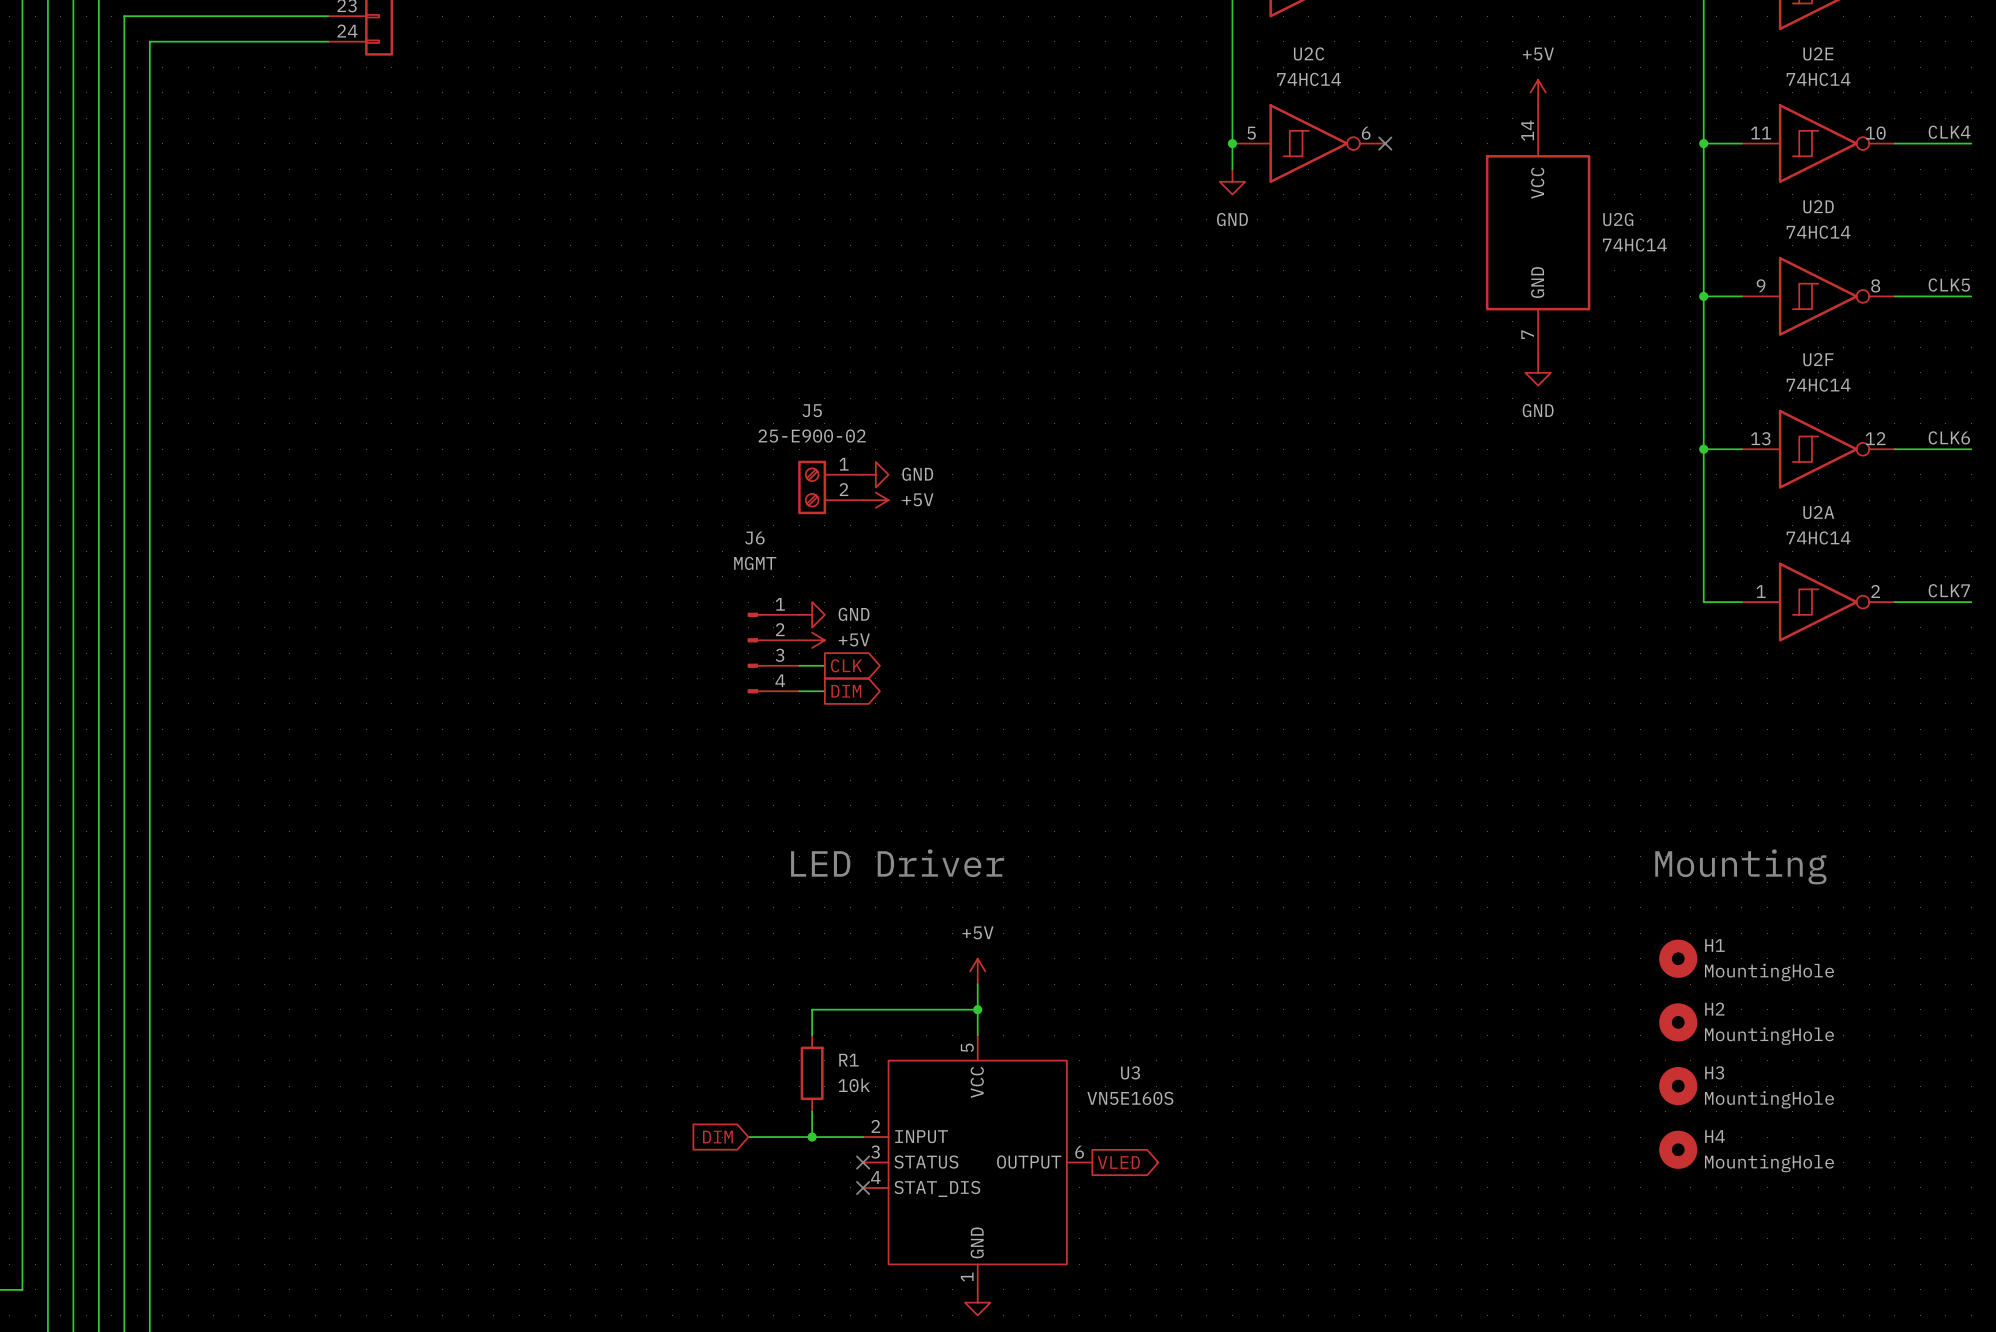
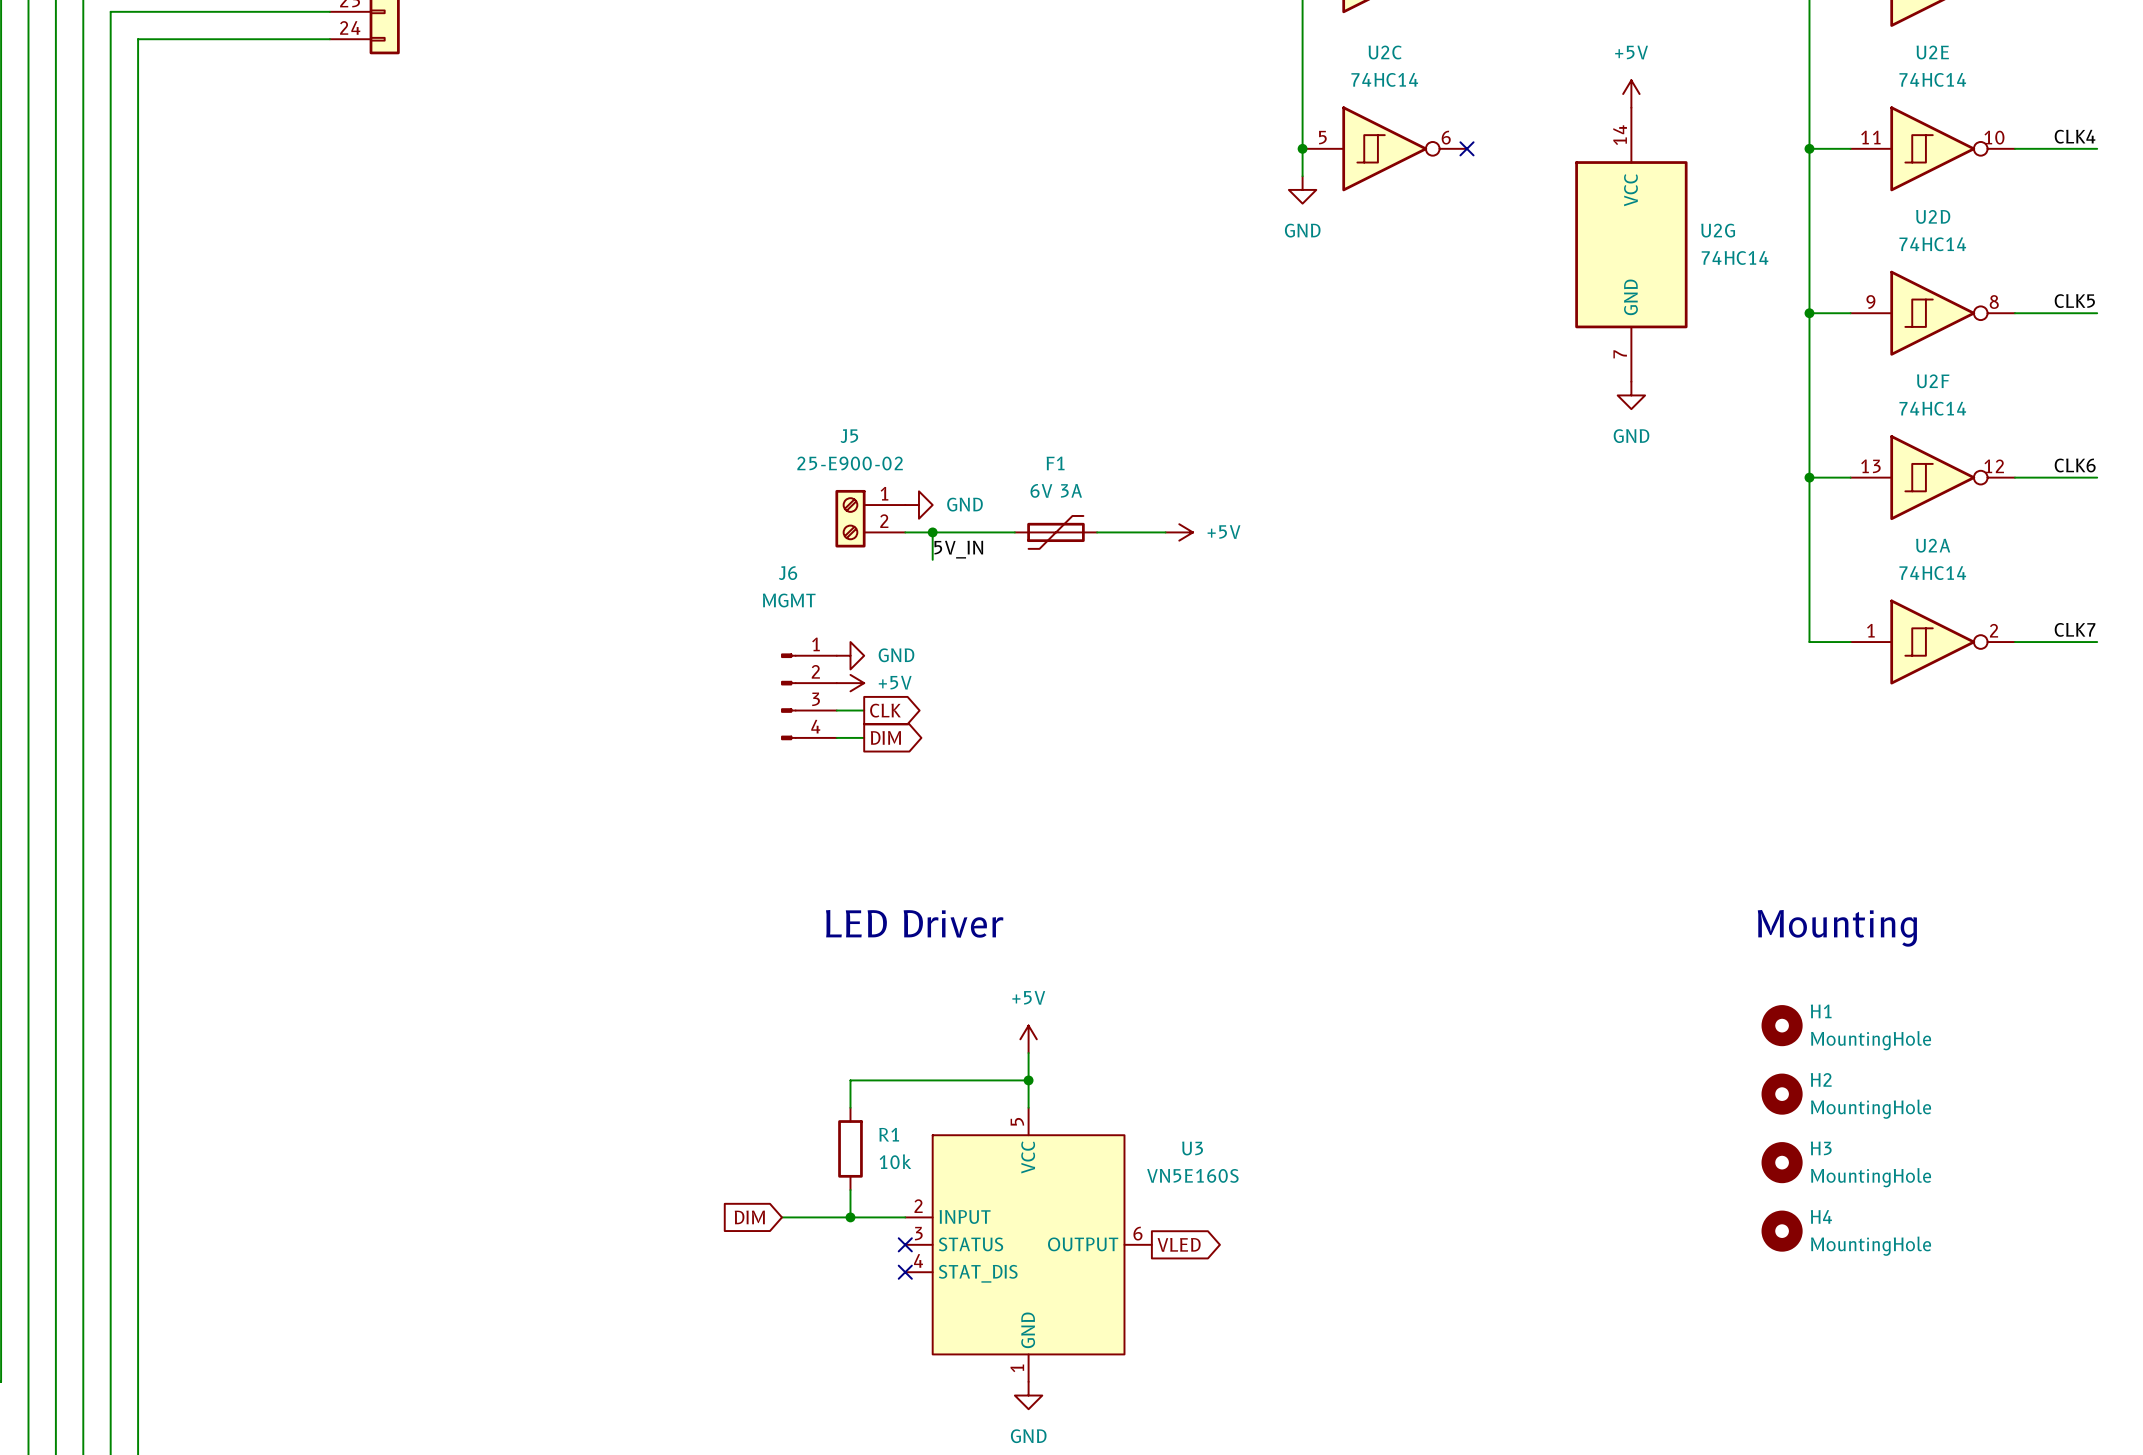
wire: none -> (905, 532) (1014, 532)
power symbol position: +5V (875, 500) -> +5V (1179, 532)
wire: none -> (932, 532) (932, 559)
junction: none -> (932, 532)
F1: none -> 6V 3A (1055, 532)
wire: none -> (1097, 532) (1165, 532)
label: none -> 5V_IN (958, 549)

